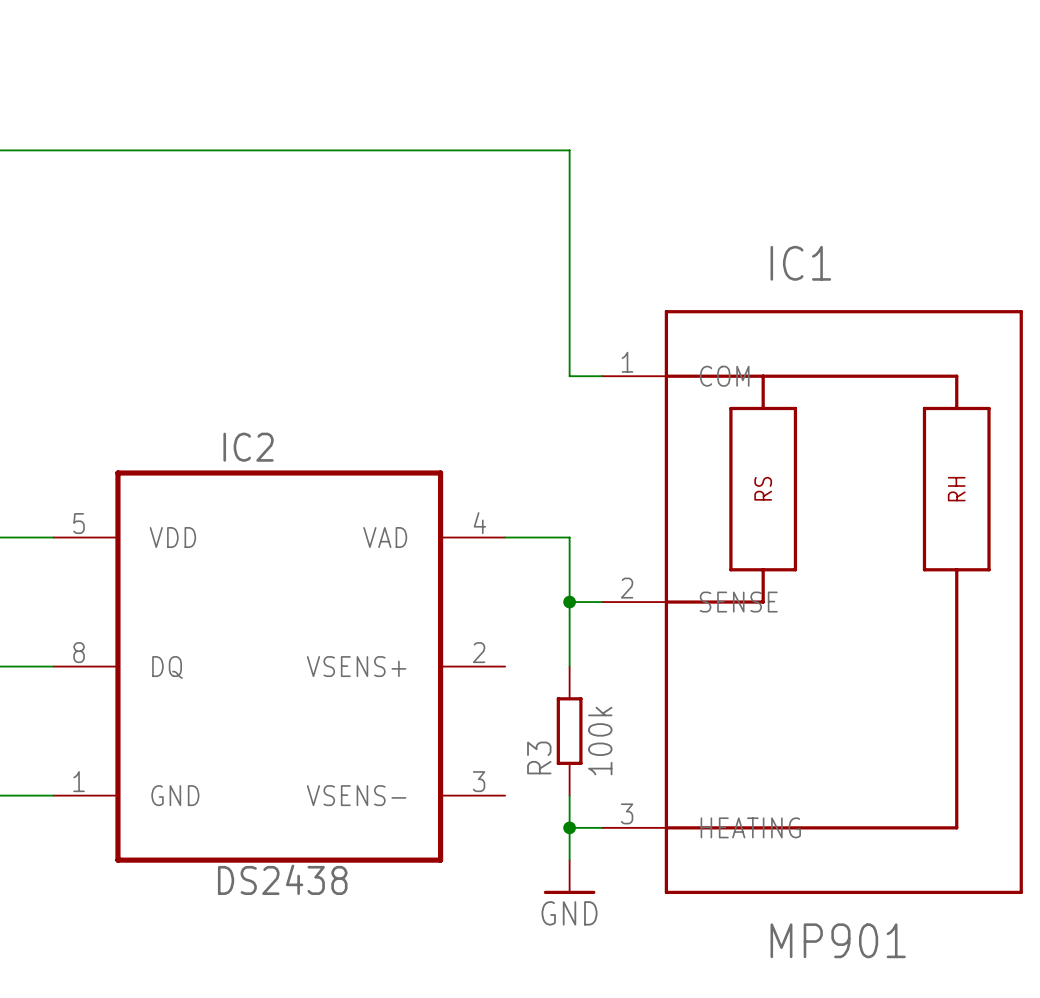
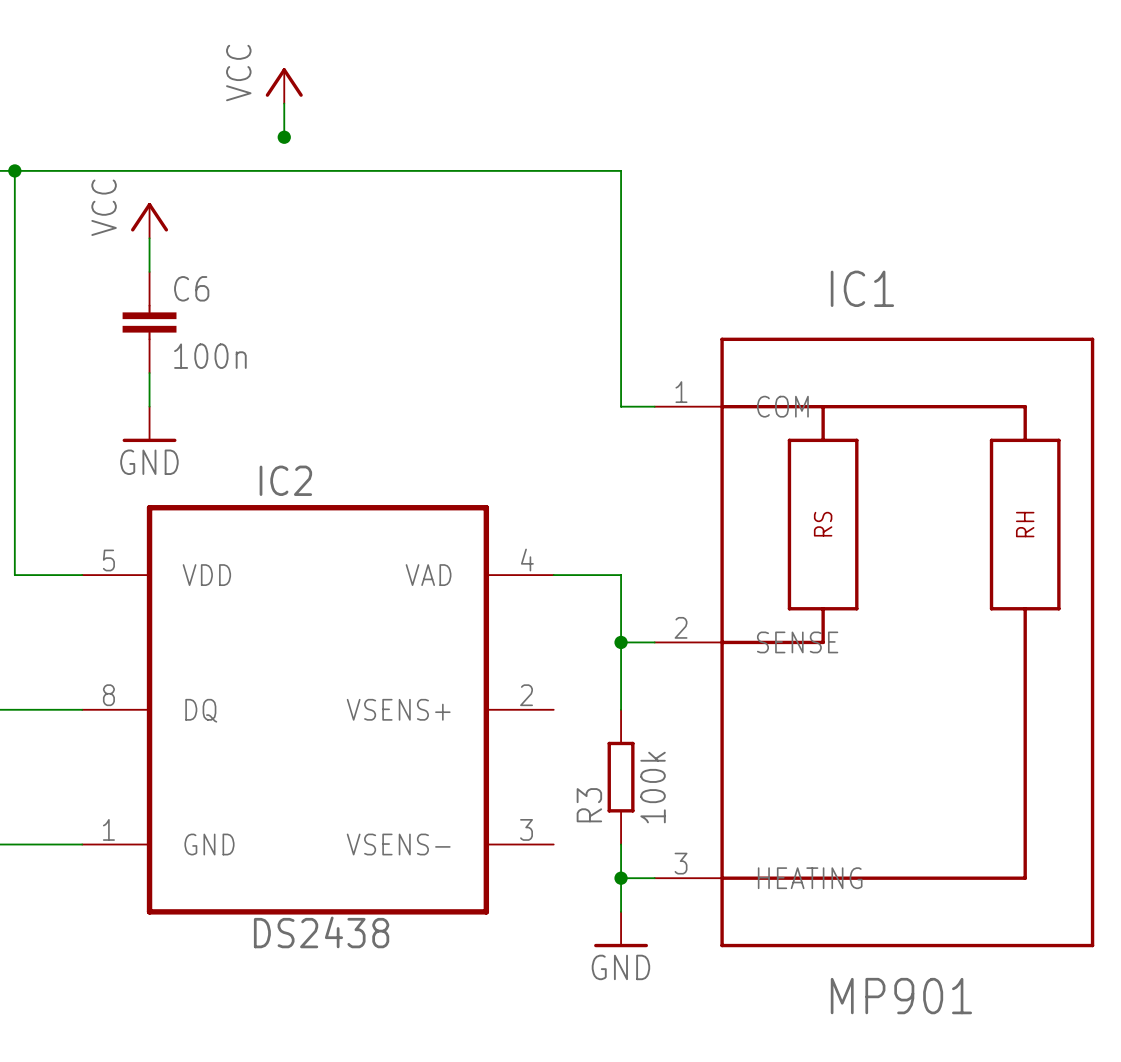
power symbol: none -> VCC (284, 85)
wire: none -> (284, 103) (284, 137)
junction: none -> (284, 137)
power symbol: none -> VCC (149, 220)
wire: none -> (149, 238) (149, 271)
C6: none -> 100n (149, 322)
wire: none -> (149, 373) (149, 406)
power symbol: none -> GND (149, 424)

